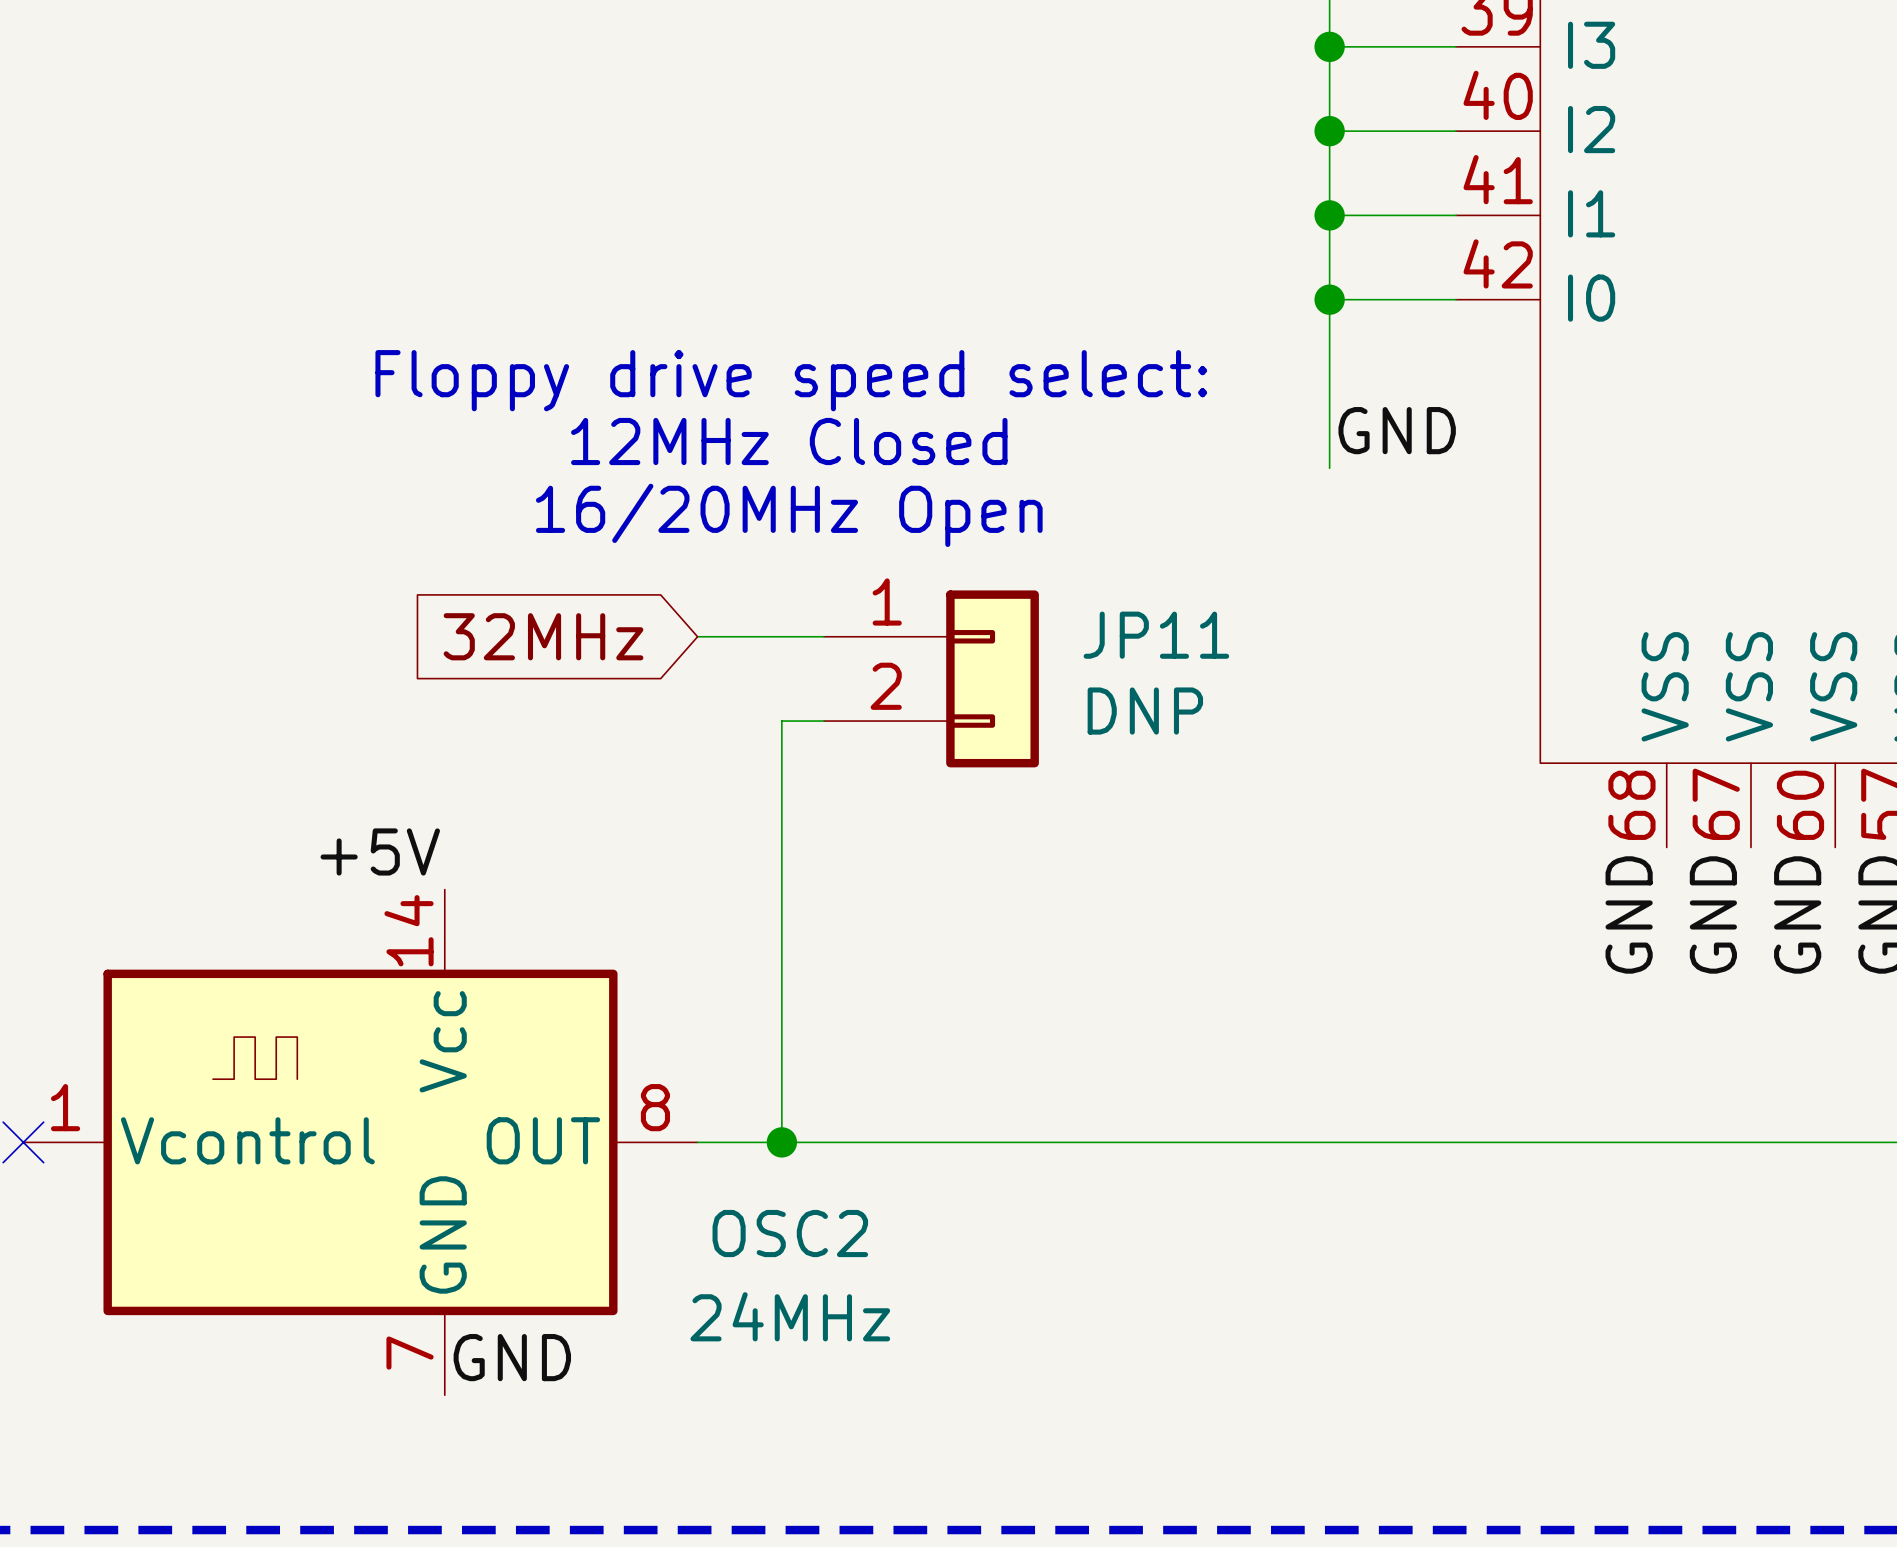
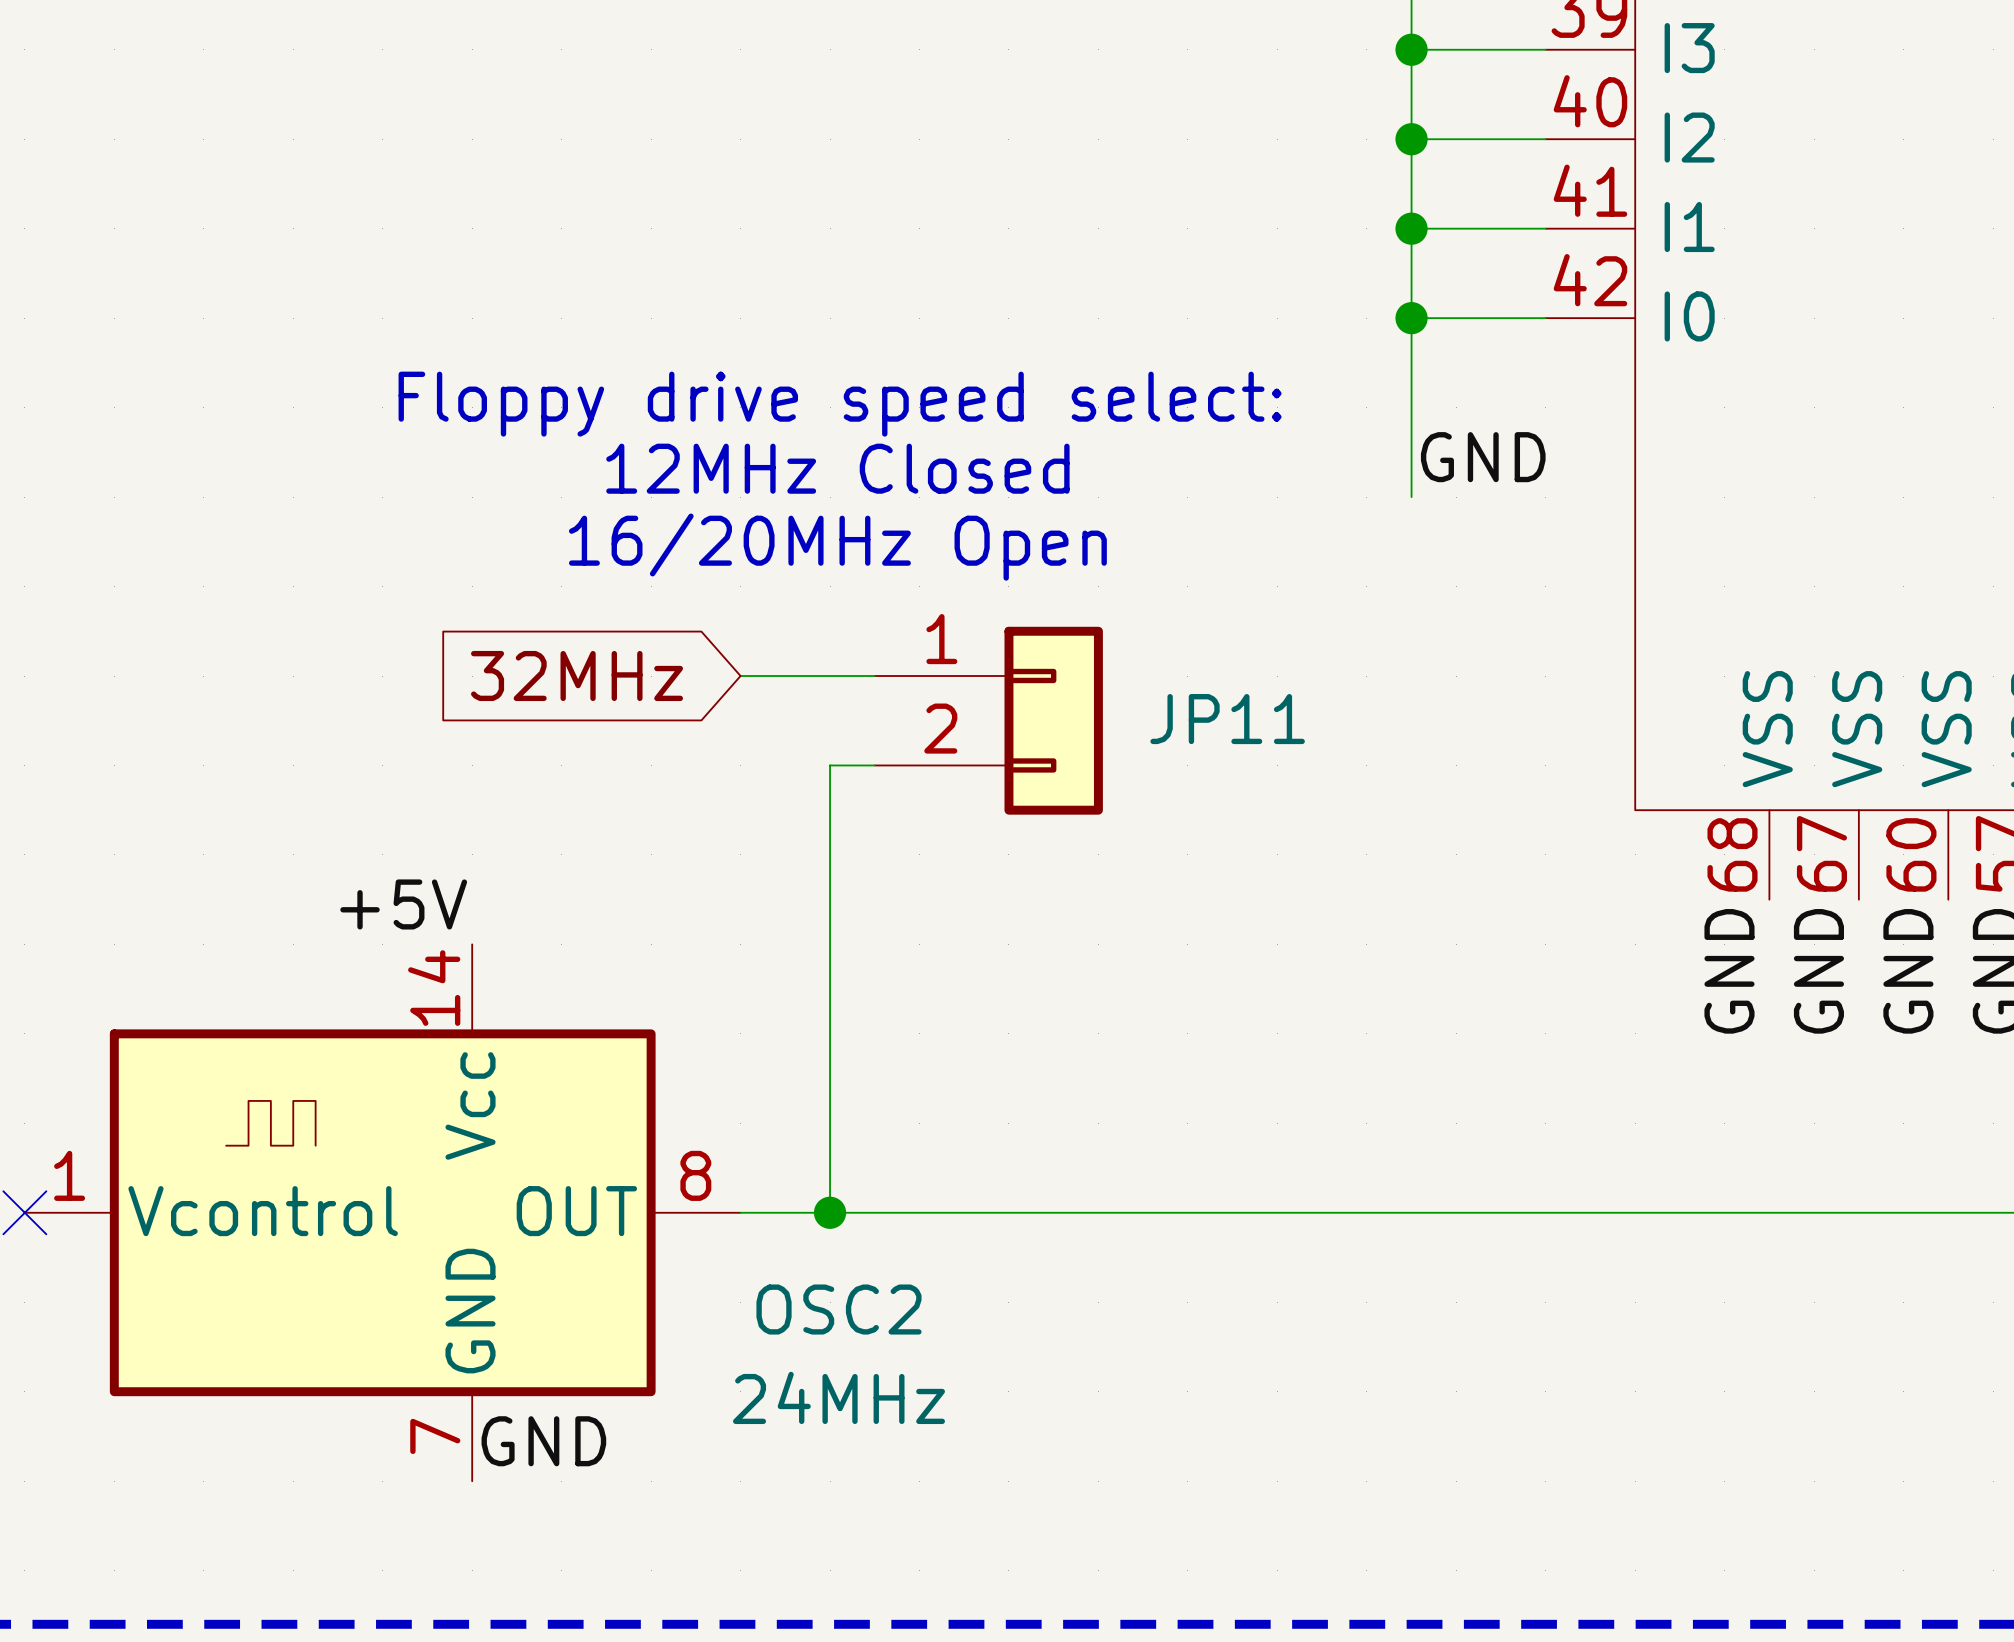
JP11 name position: JP11 (1156, 635) -> JP11 (1227, 719)
JP11 value: DNP (1145, 711) -> none

